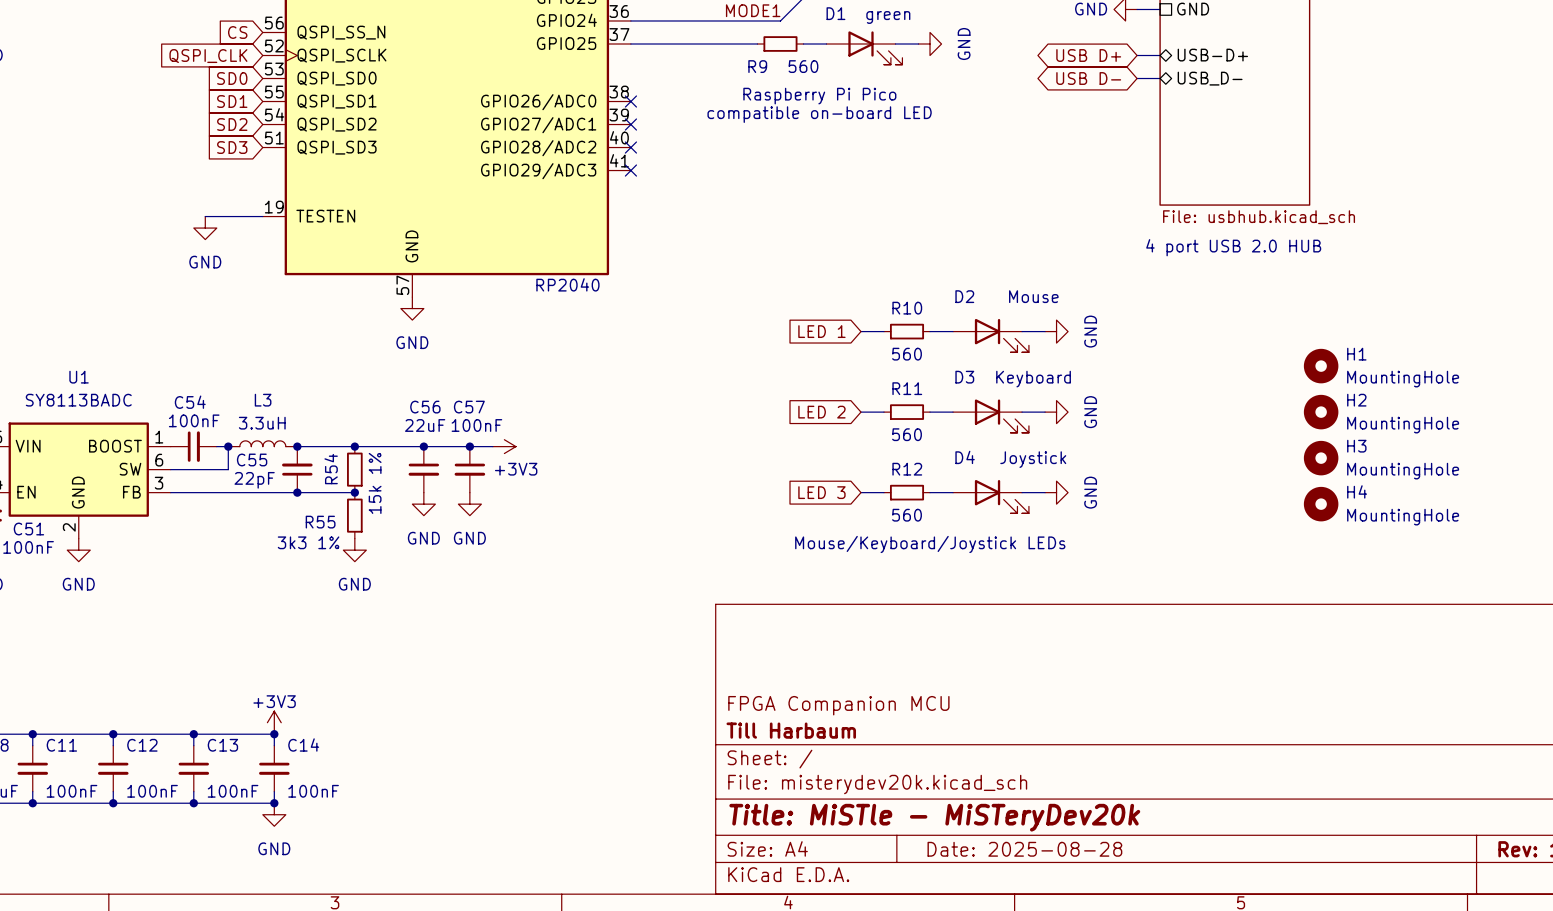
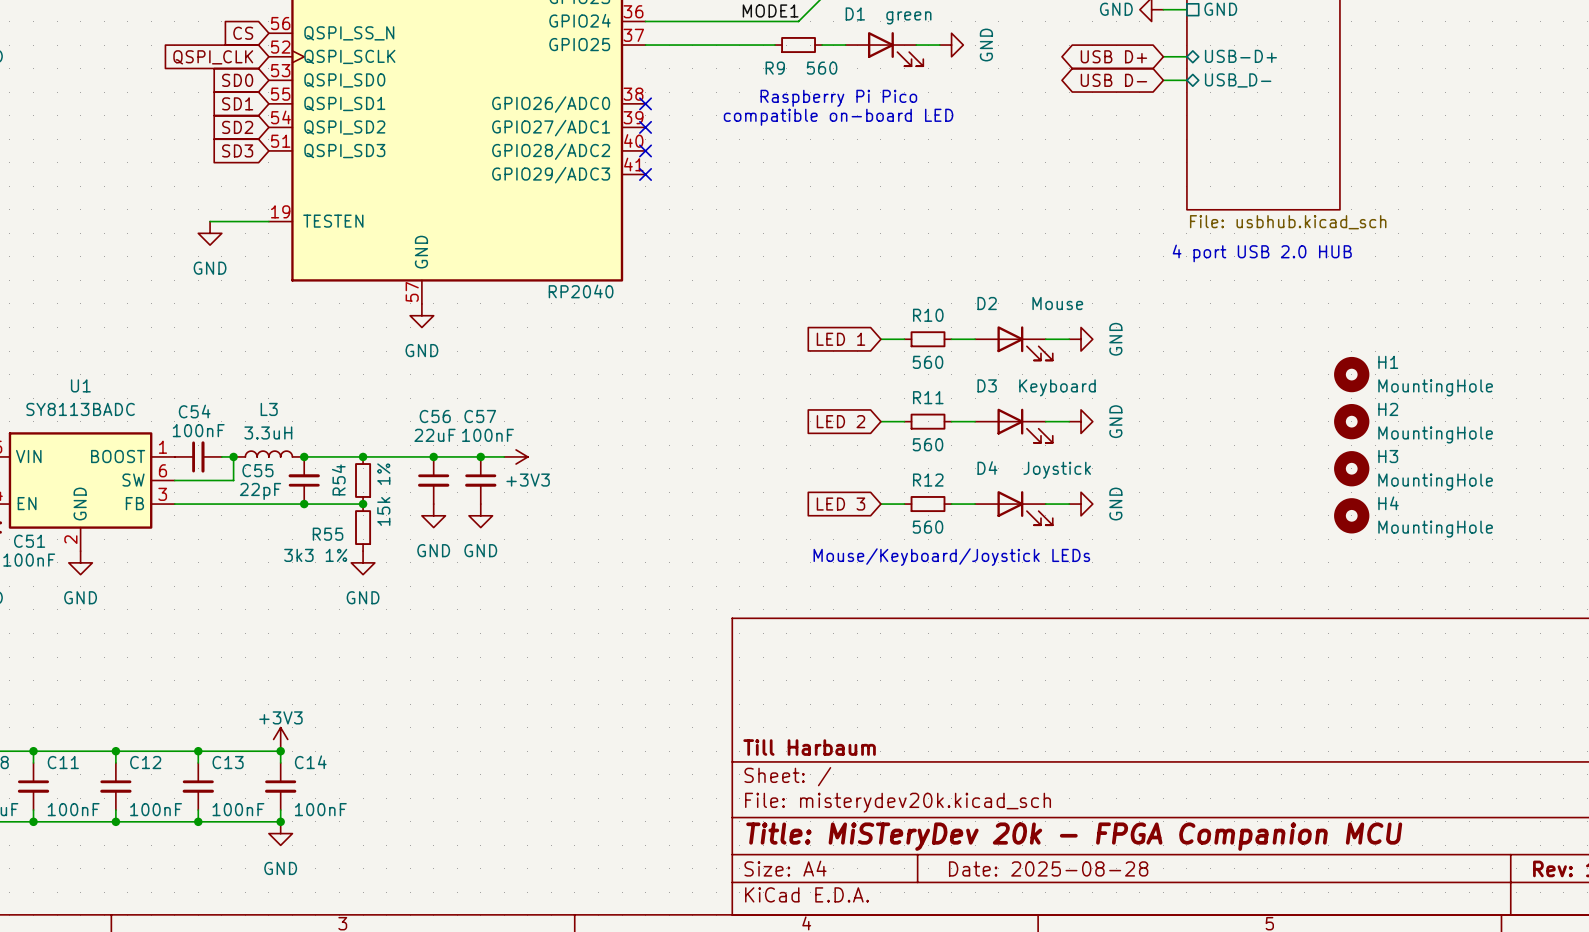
title block: FPGA Companion MCU (838, 705) -> none
title block: Title: MiSTle - MiSTeryDev20k (934, 817) -> Title: MiSTeryDev 20k - FPGA Companion MCU (1074, 836)

